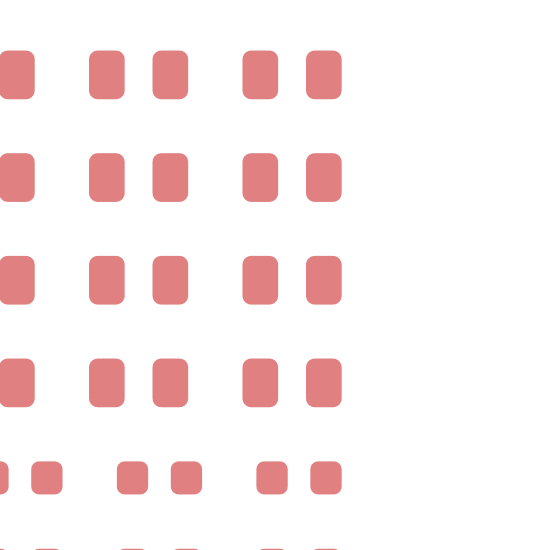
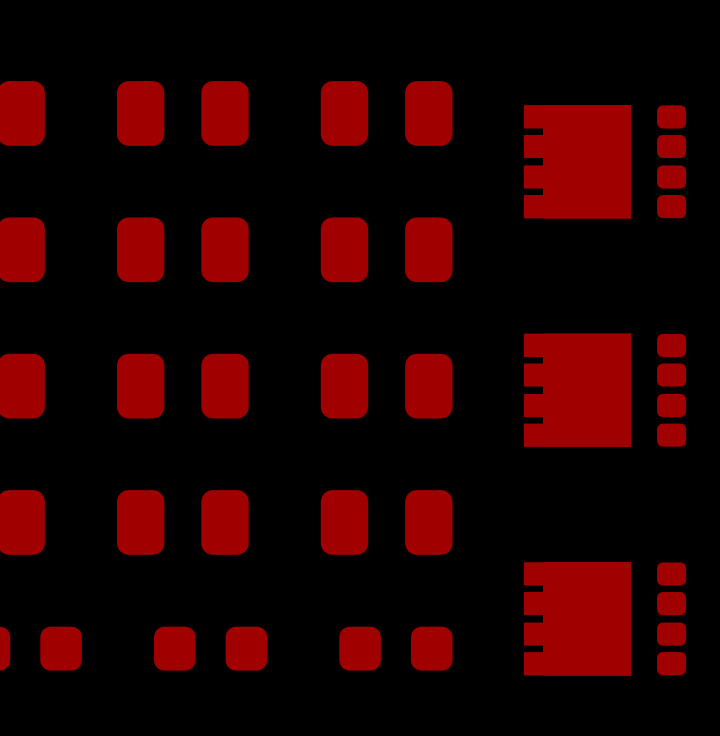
part: none -> (605, 161)
part: none -> (605, 390)
part: none -> (605, 618)

